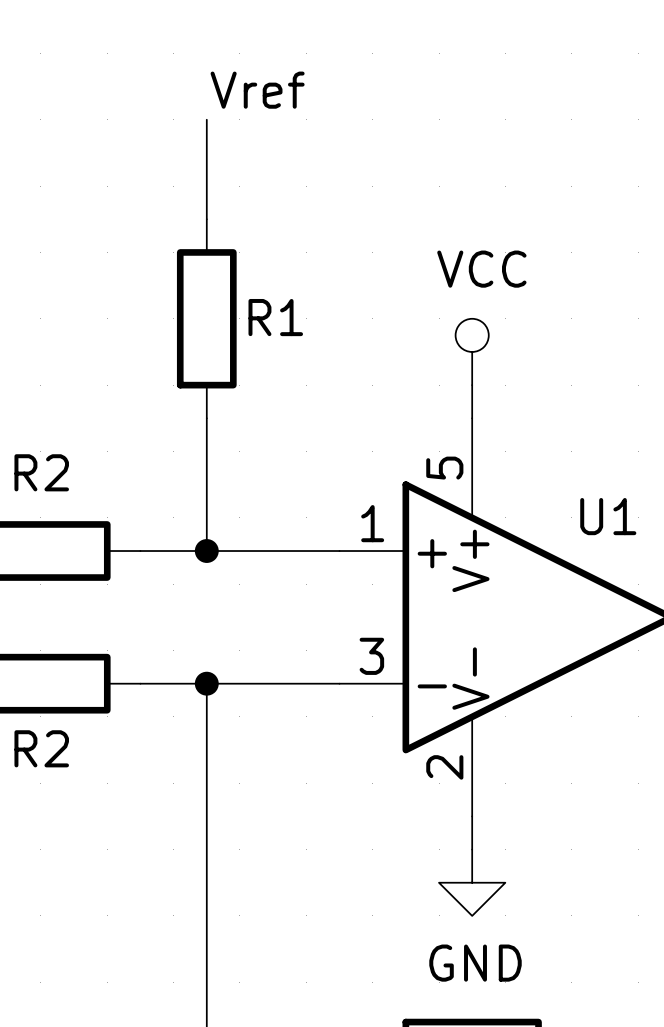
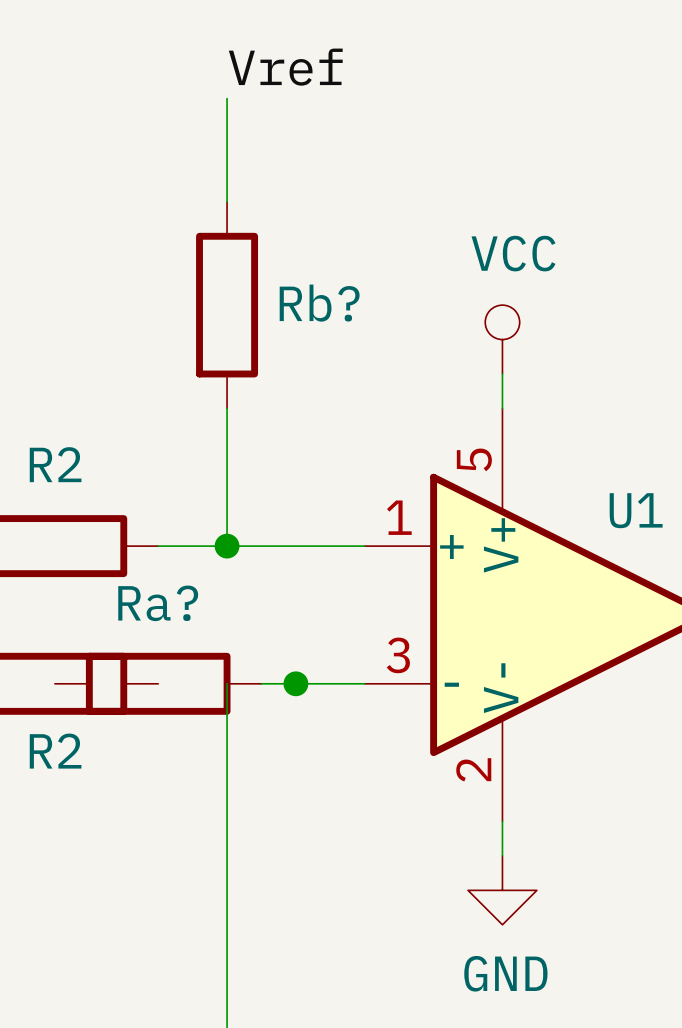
Rb? value: R1 (275, 317) -> none
Rb? name: none -> Rb? (319, 303)
wire: (140, 683) (239, 683) -> none
Ra?: none -> (158, 683)
junction position: (206, 683) -> (295, 683)

